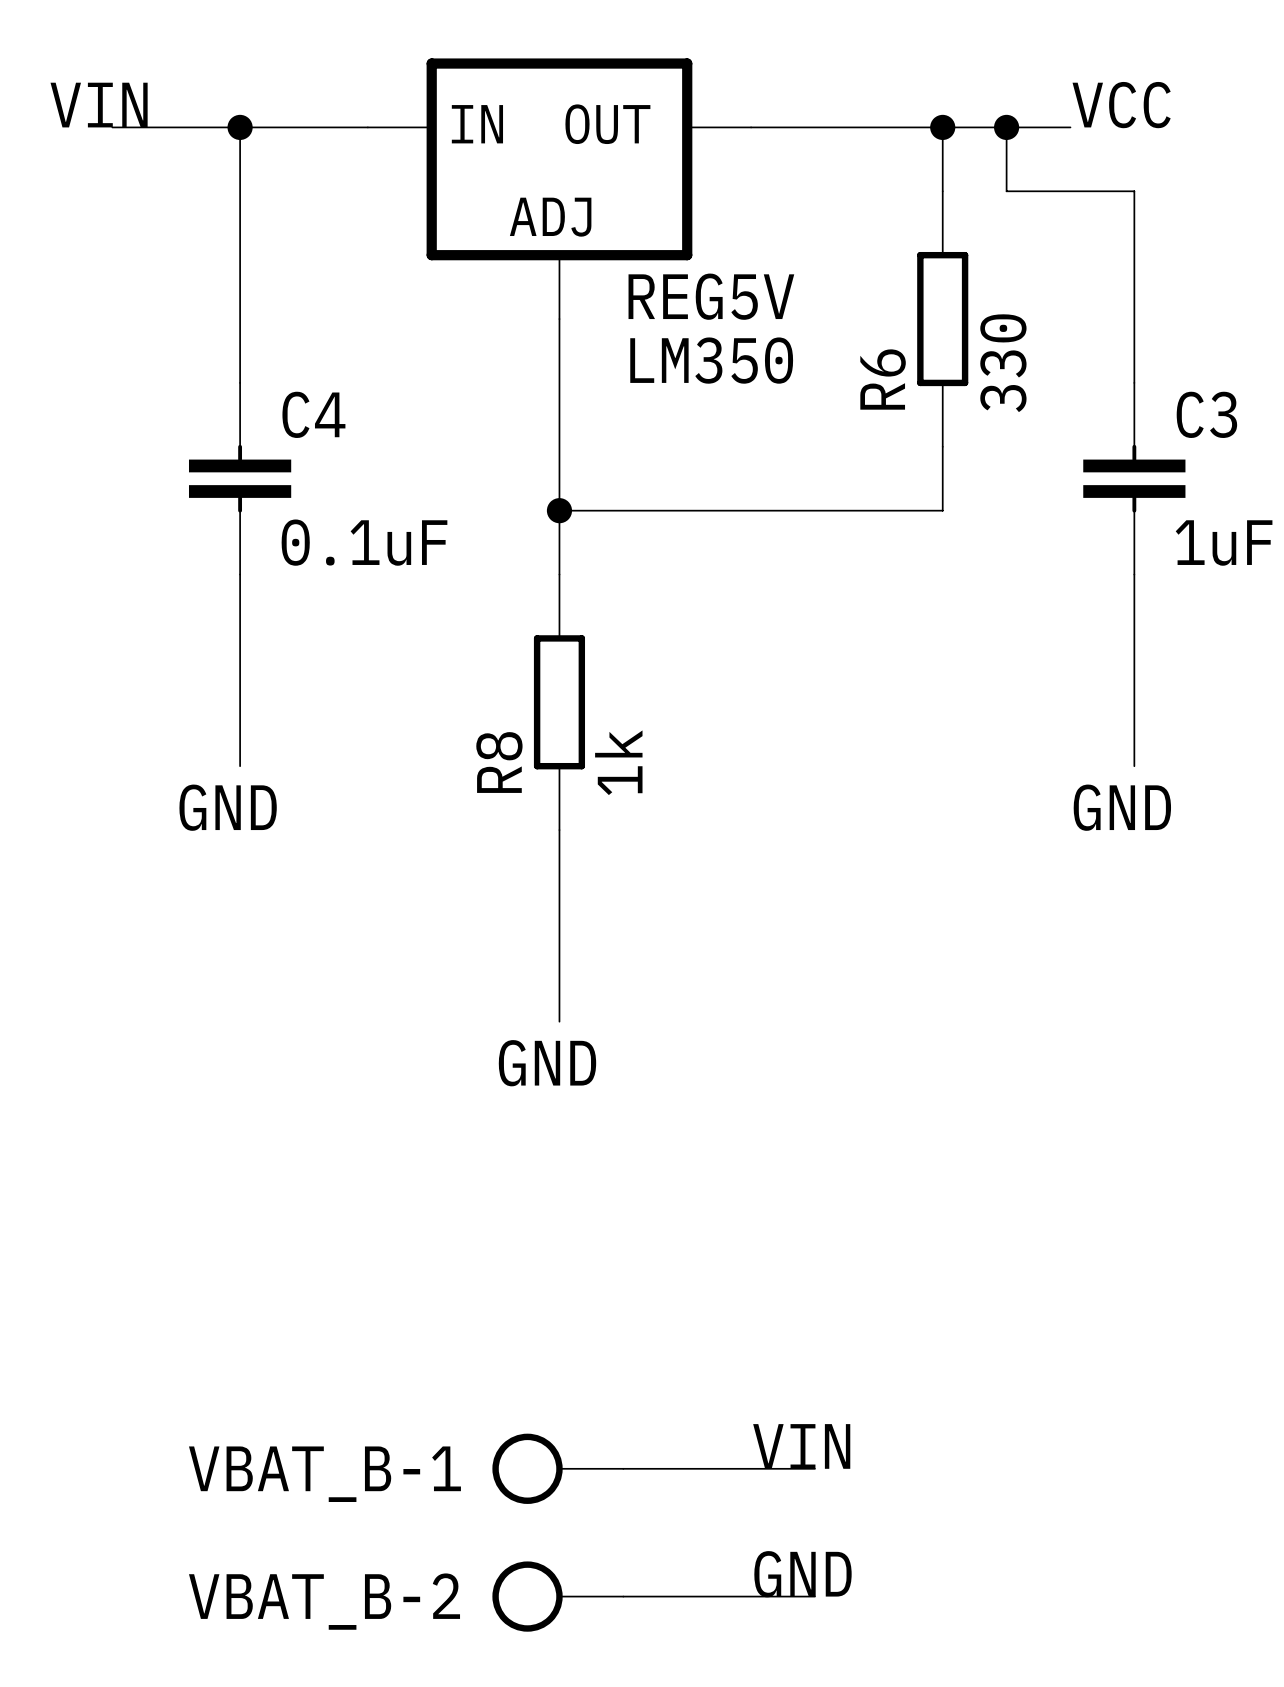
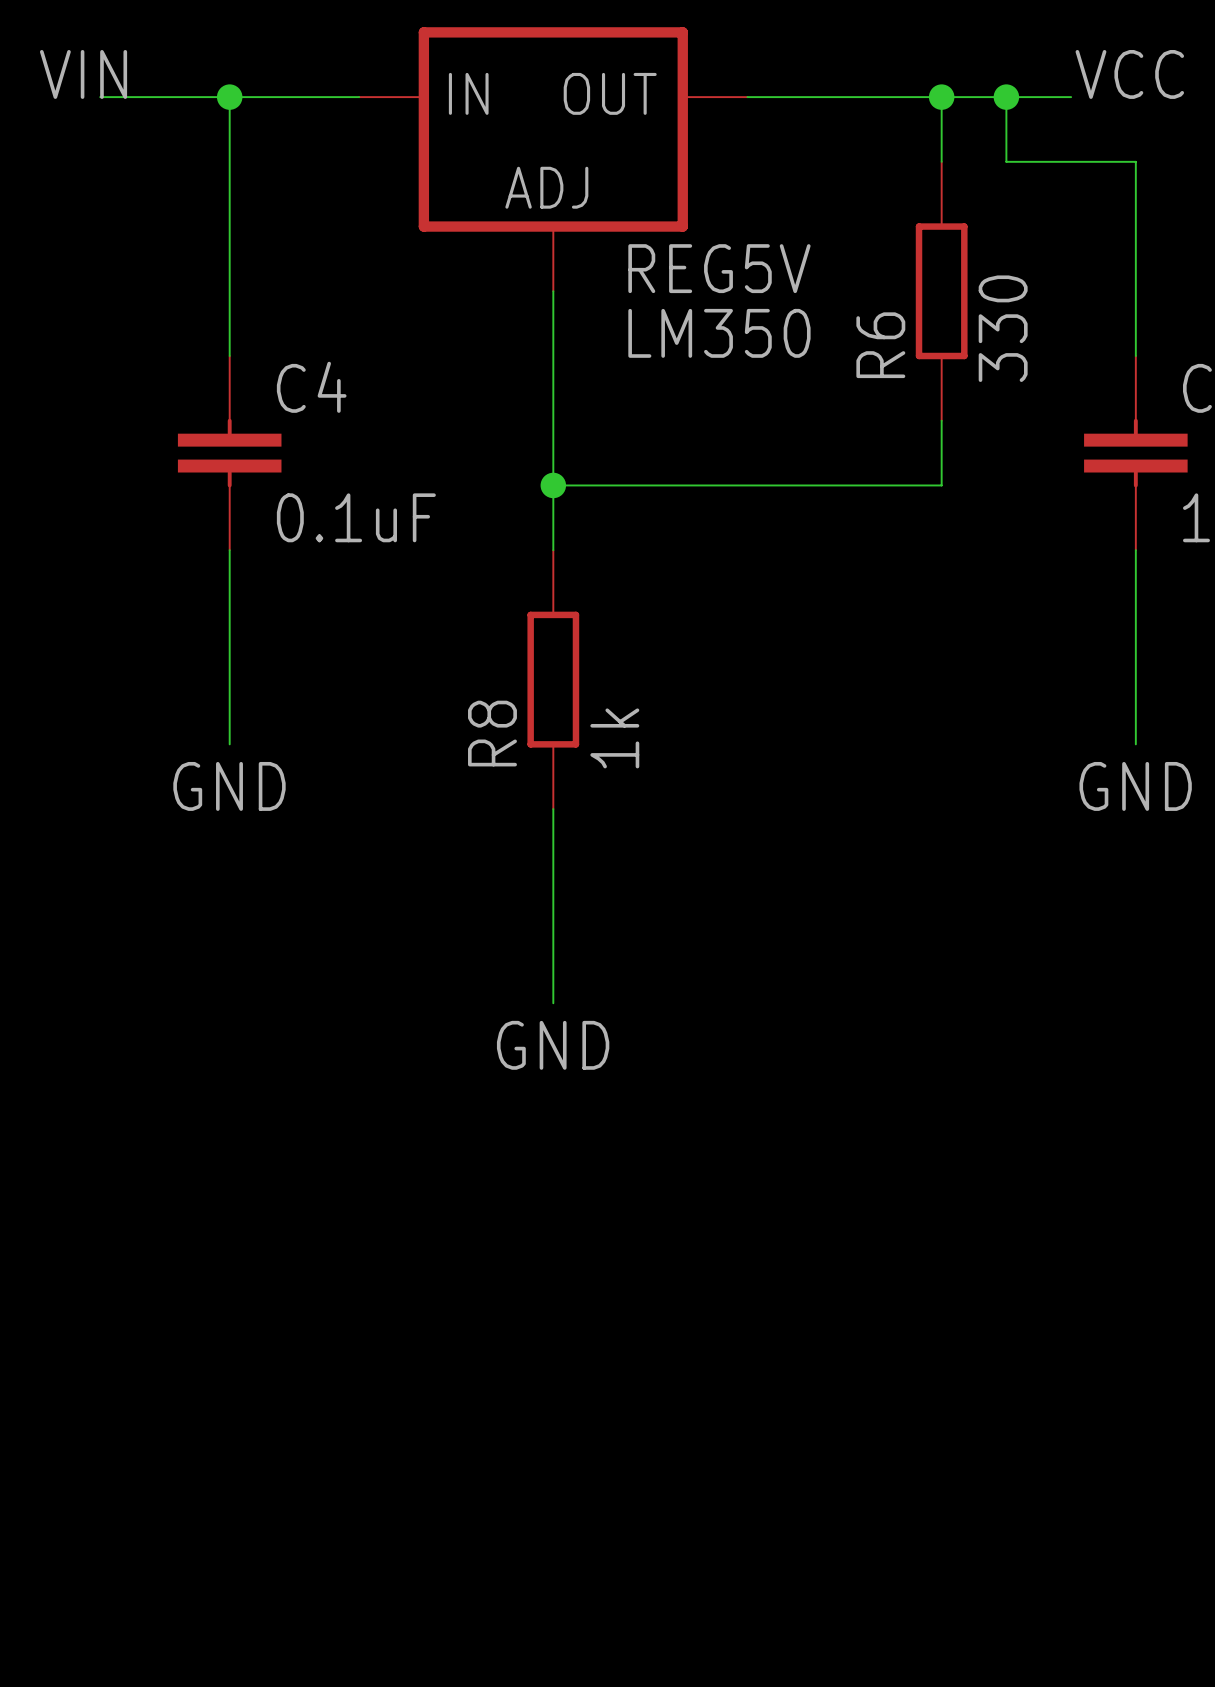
label: VIN (801, 1446) -> none
VBAT_B-1: (557, 1468) -> none
wire: (623, 1468) (814, 1468) -> none
label: GND (802, 1574) -> none
VBAT_B-2: (557, 1596) -> none
wire: (623, 1596) (814, 1596) -> none

